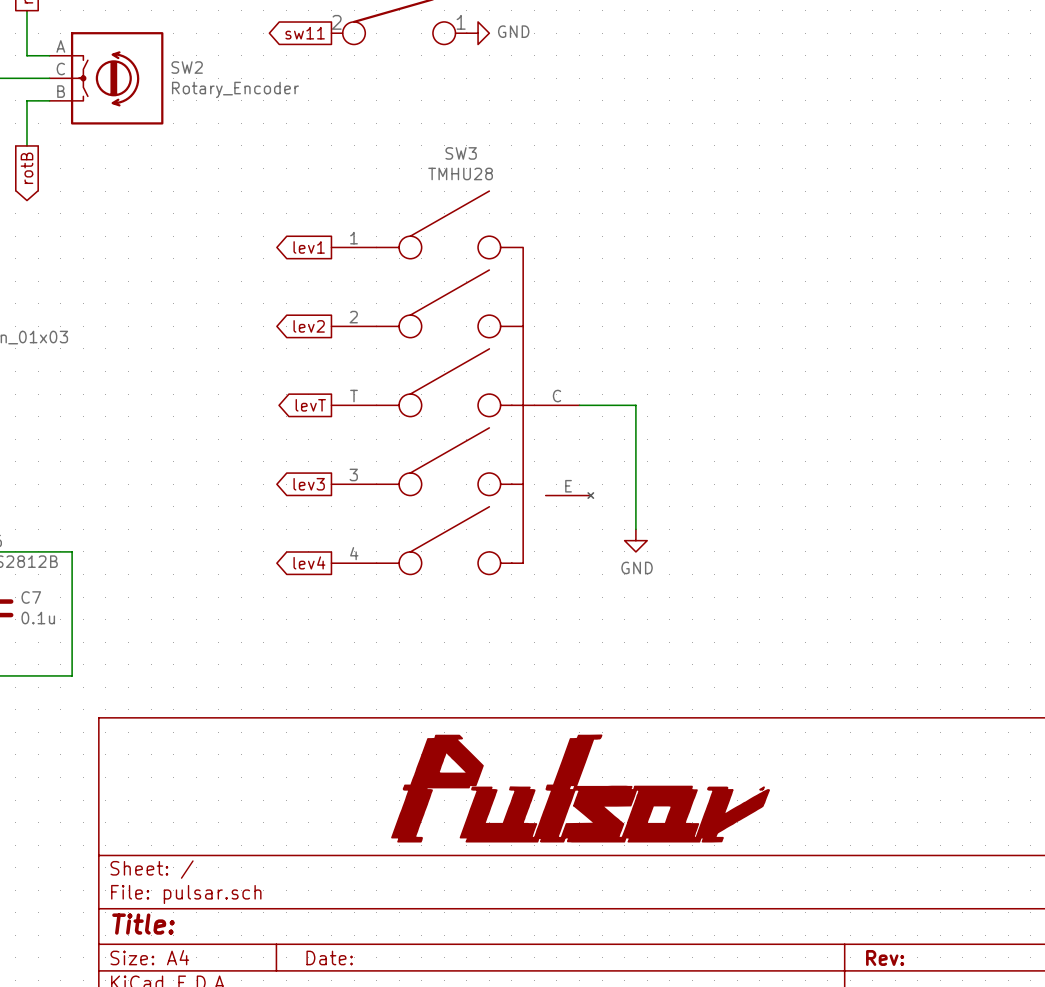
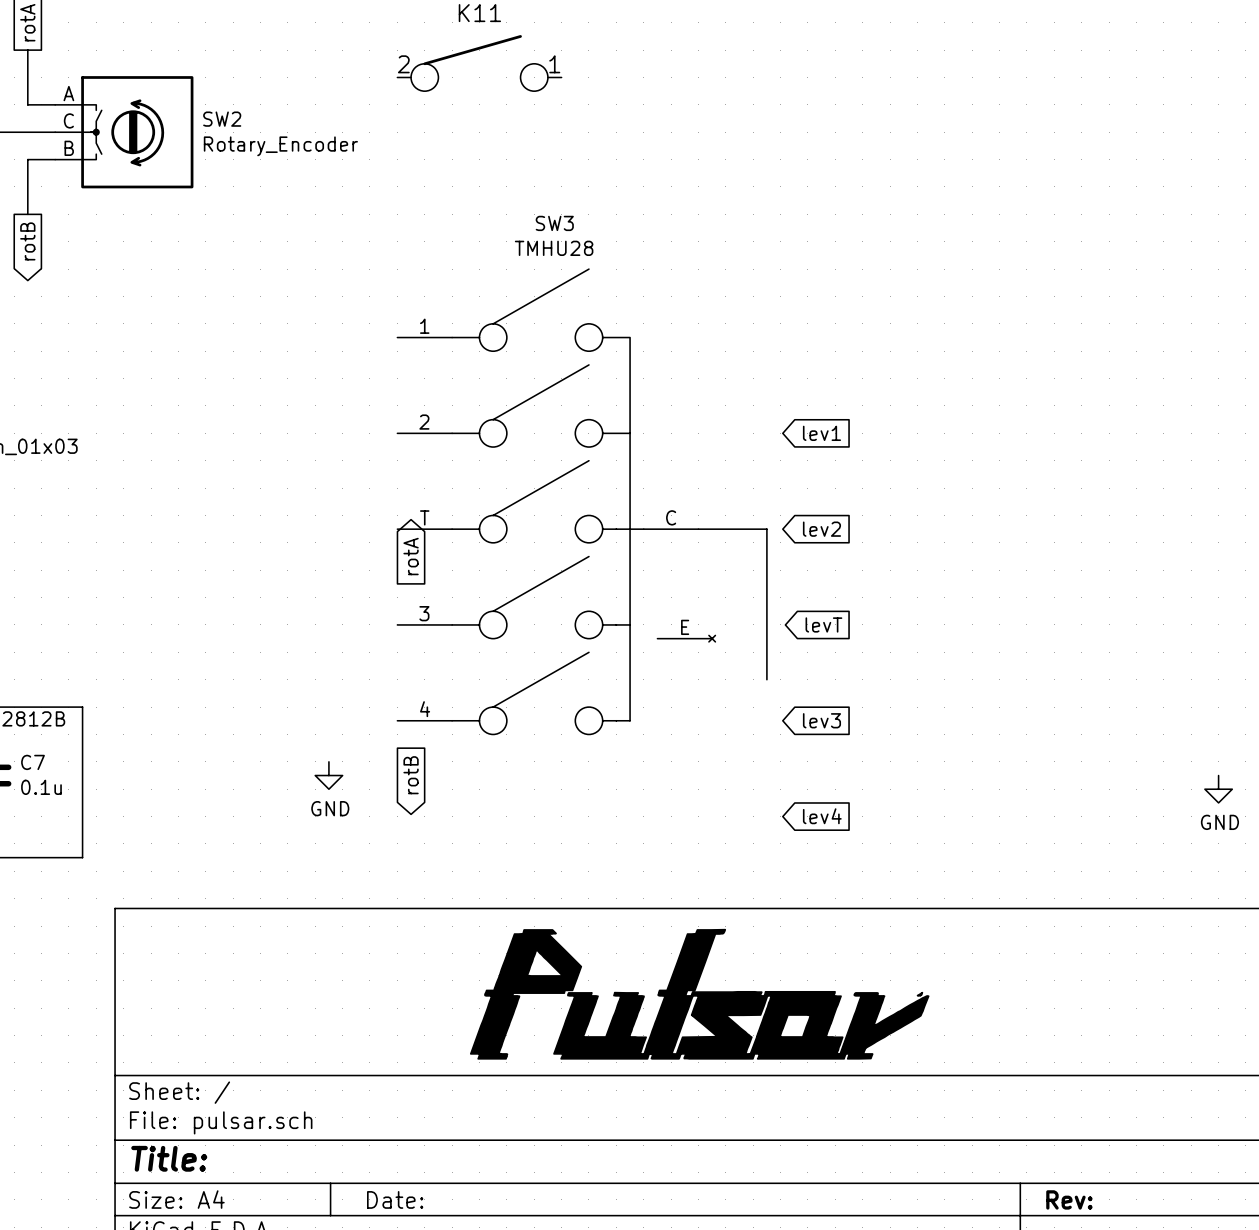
global label: sw11 (305, 33) -> none
power symbol: GND (478, 33) -> none
global label: lev1 (309, 247) -> none
global label: lev2 (309, 326) -> none
global label: none -> lev1 (821, 433)
global label: levT (310, 405) -> none
global label: none -> lev2 (821, 529)
global label: none -> rotA (411, 556)
global label: lev3 (309, 484) -> none
global label: none -> levT (823, 624)
power symbol: GND (635, 540) -> none
global label: lev4 (309, 562) -> none
global label: none -> lev3 (821, 720)
power symbol: none -> GND (328, 775)
global label: none -> rotB (411, 775)
power symbol: none -> GND (1218, 789)
global label: none -> lev4 (822, 816)

